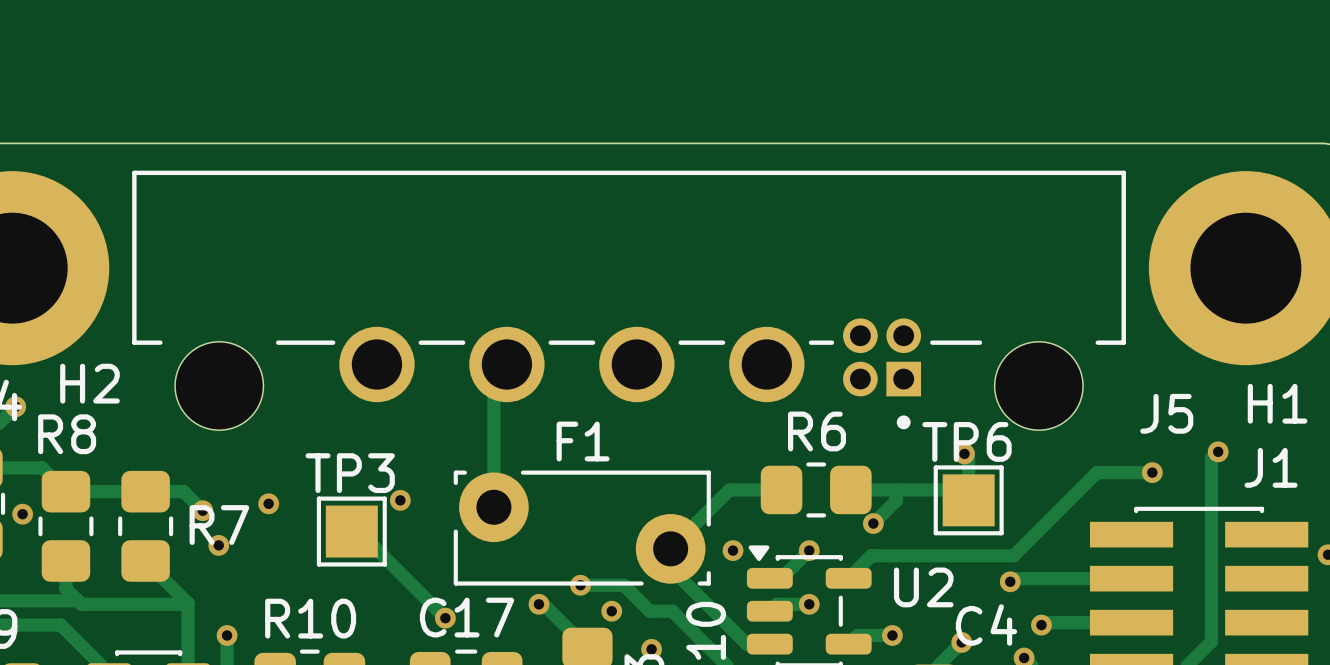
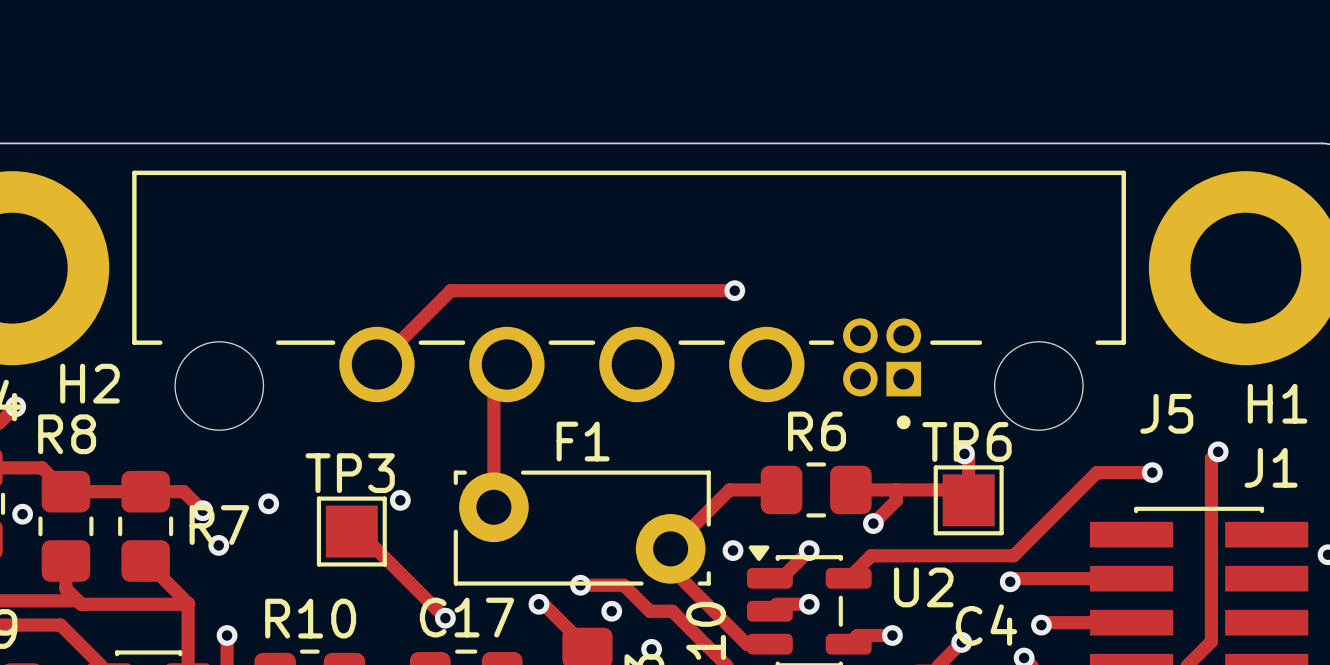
track: none -> (734, 290) (450, 290) (376, 364)
via: none -> (734, 290)

